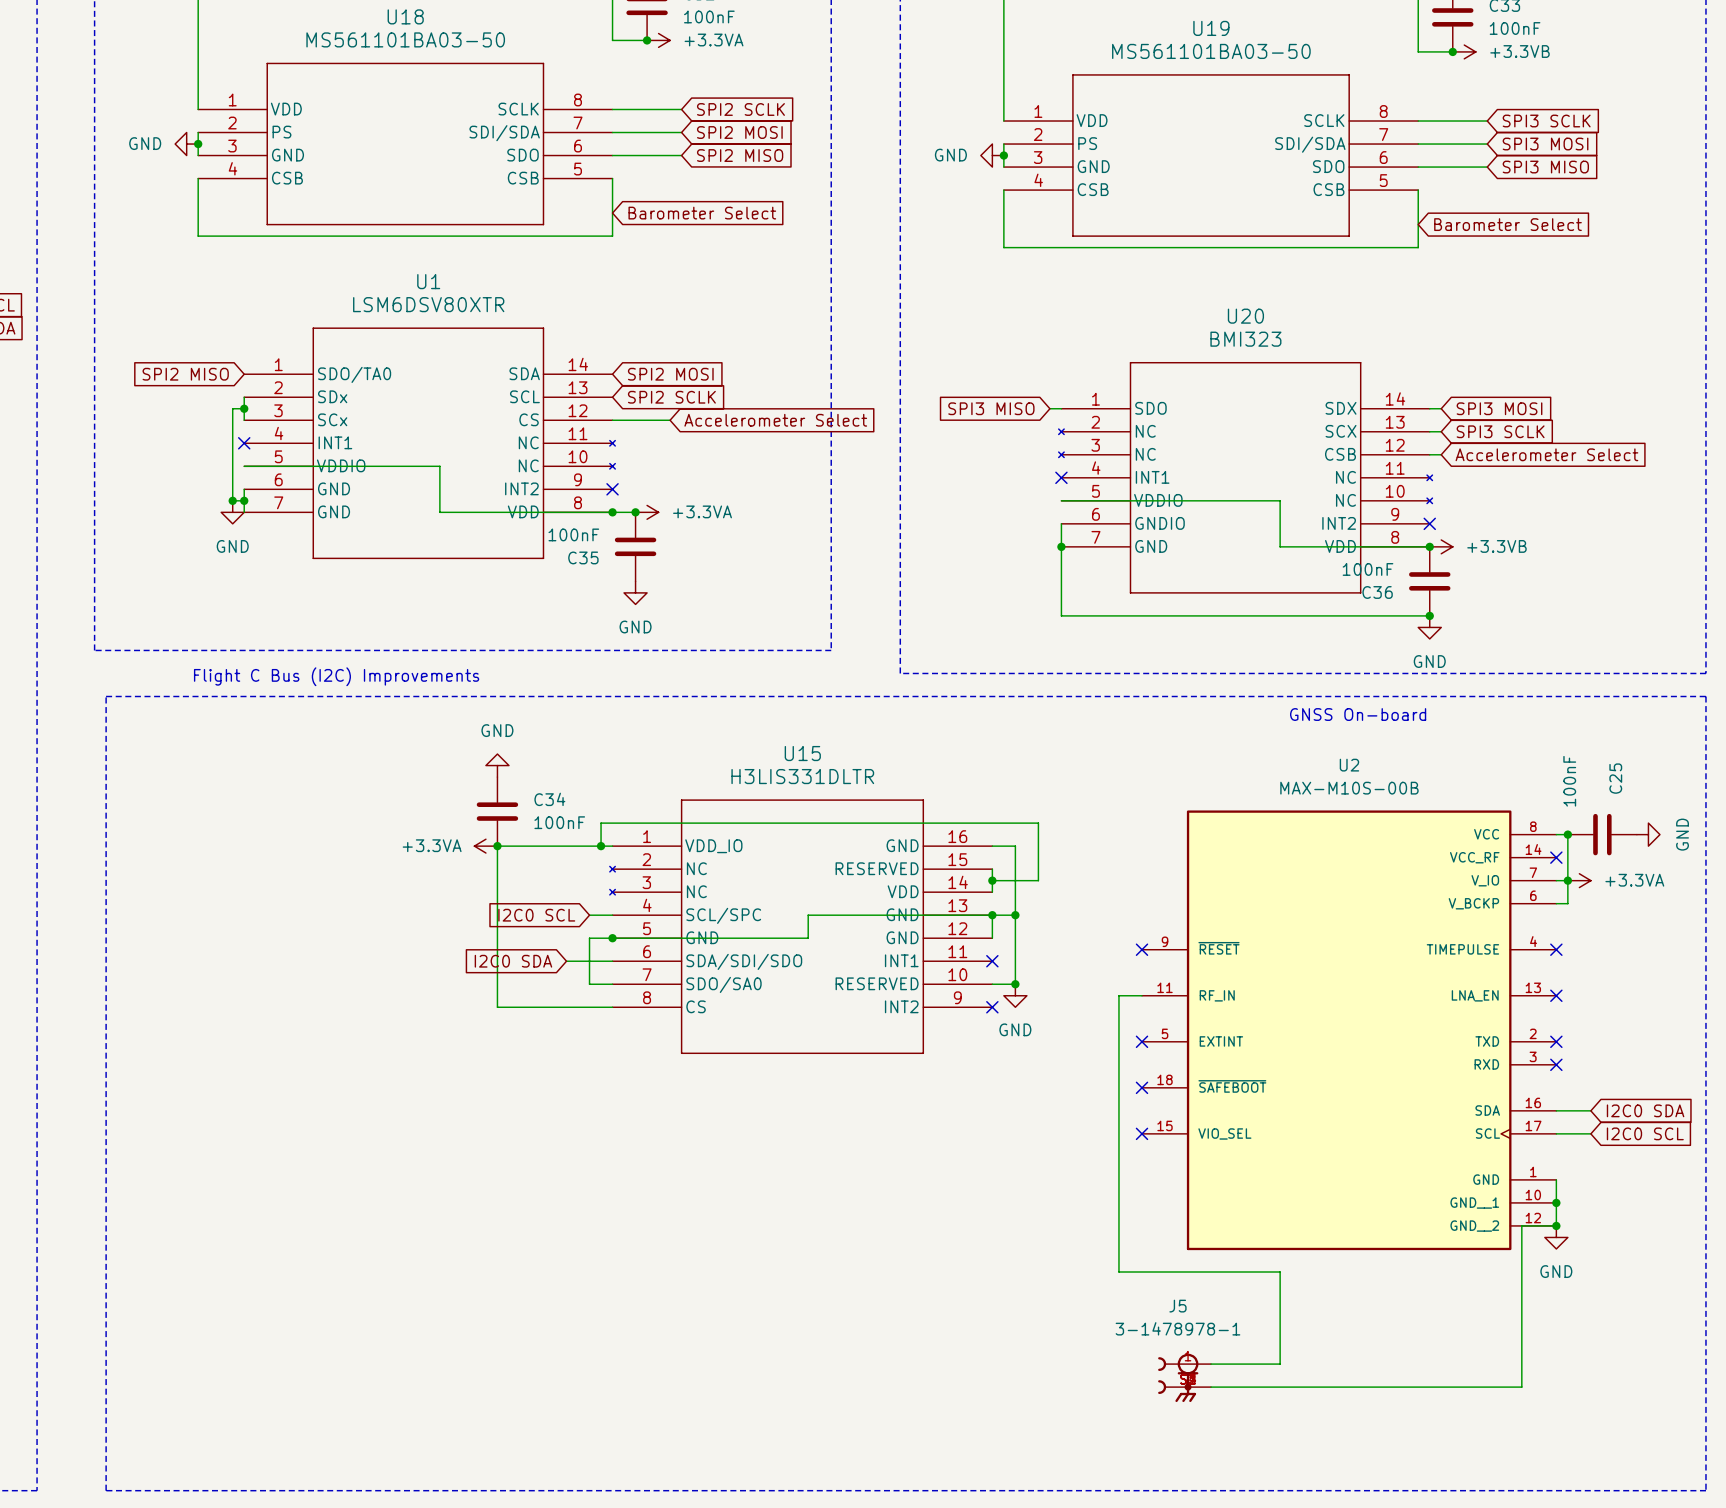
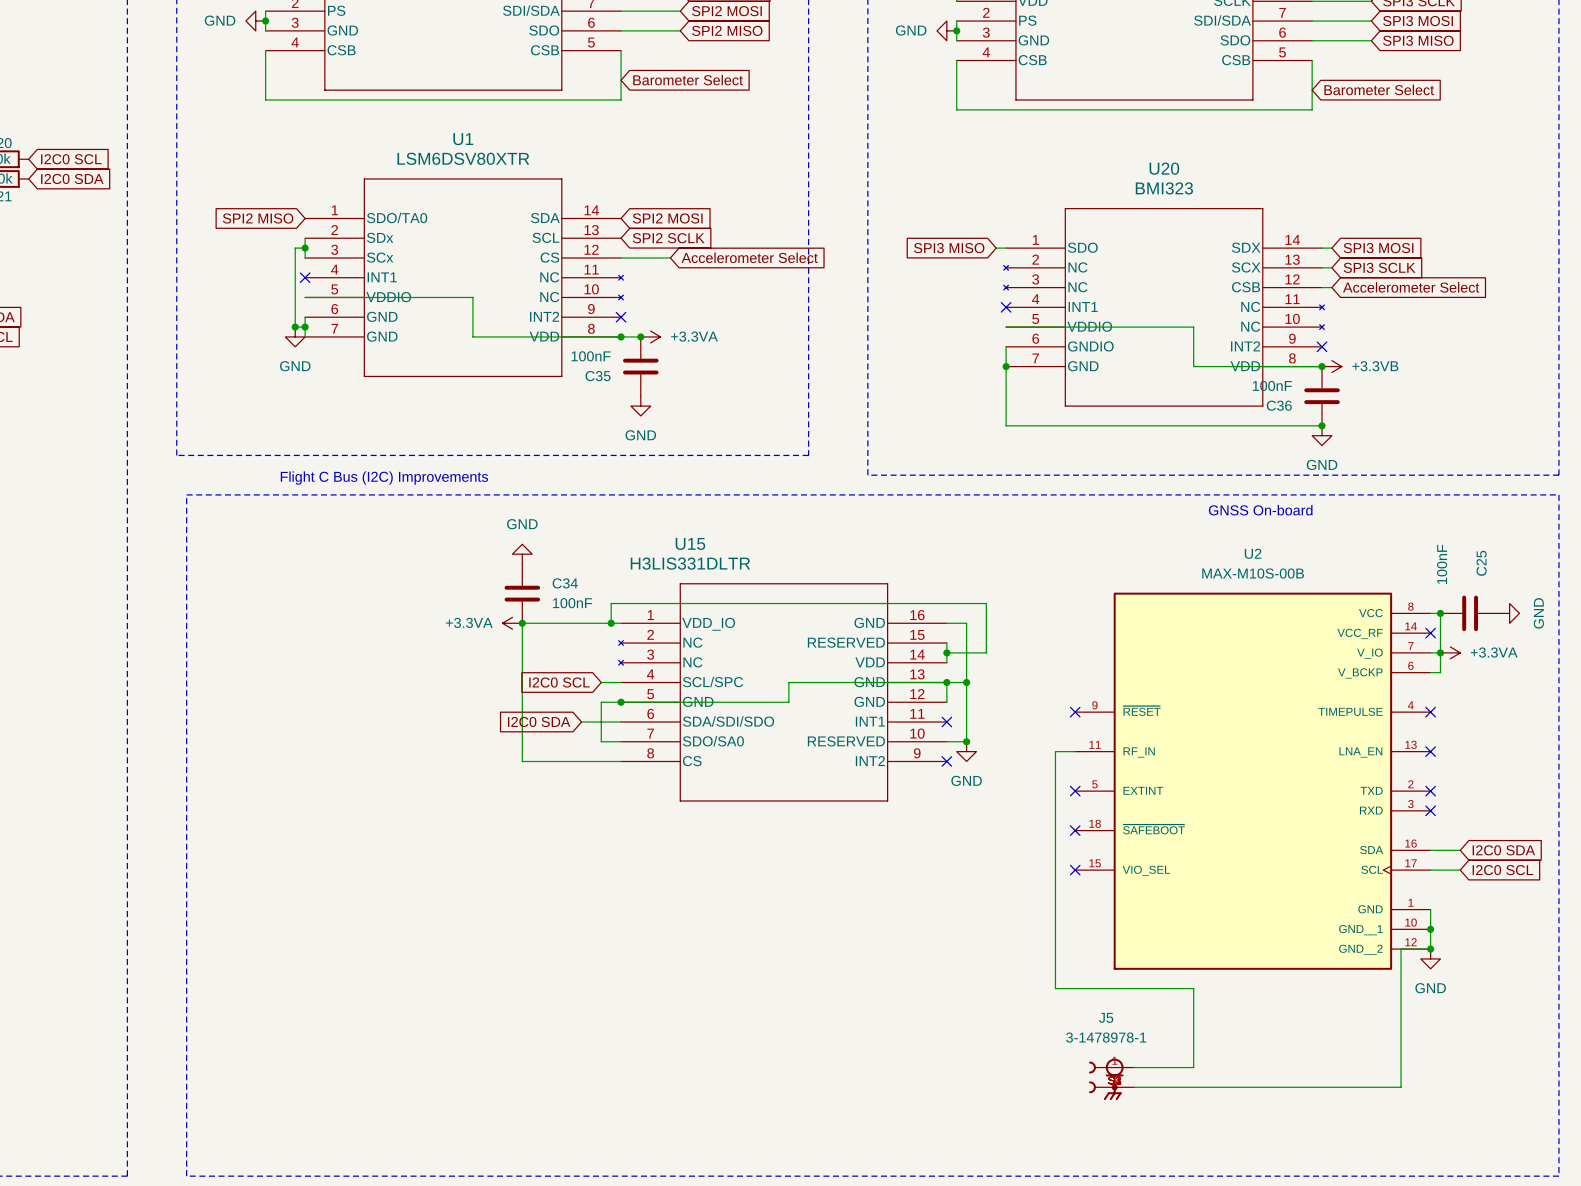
U15 name position: U15 (802, 753) -> U15 (690, 543)
U15 value position: H3LIS331DLTR (802, 776) -> H3LIS331DLTR (690, 563)

